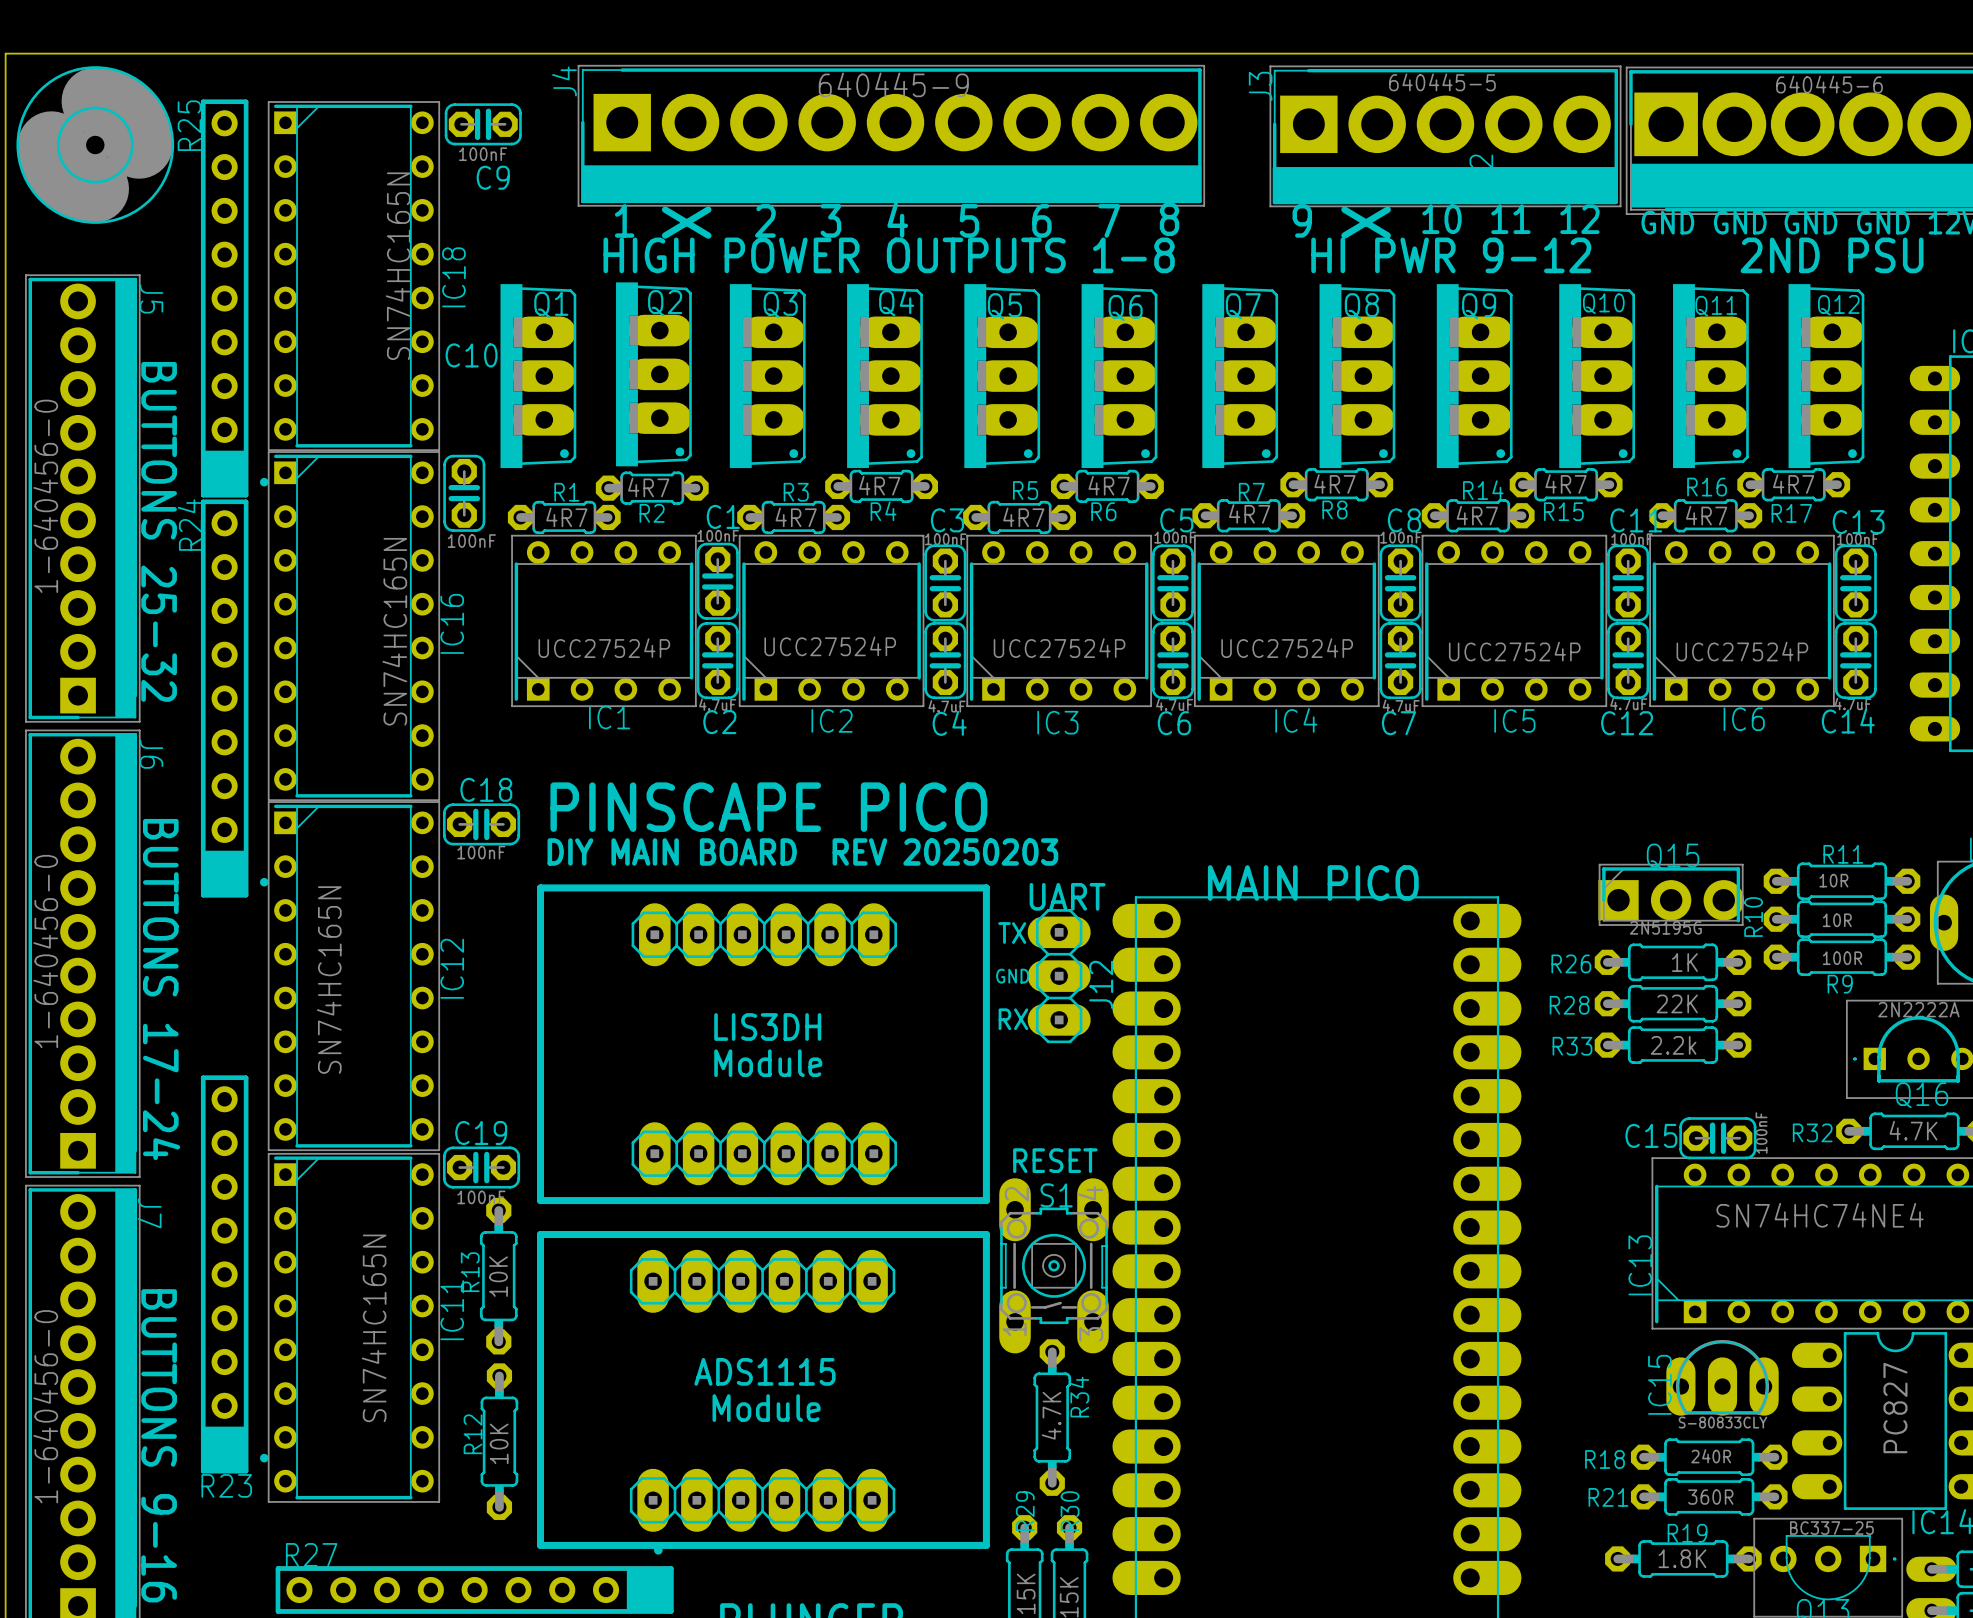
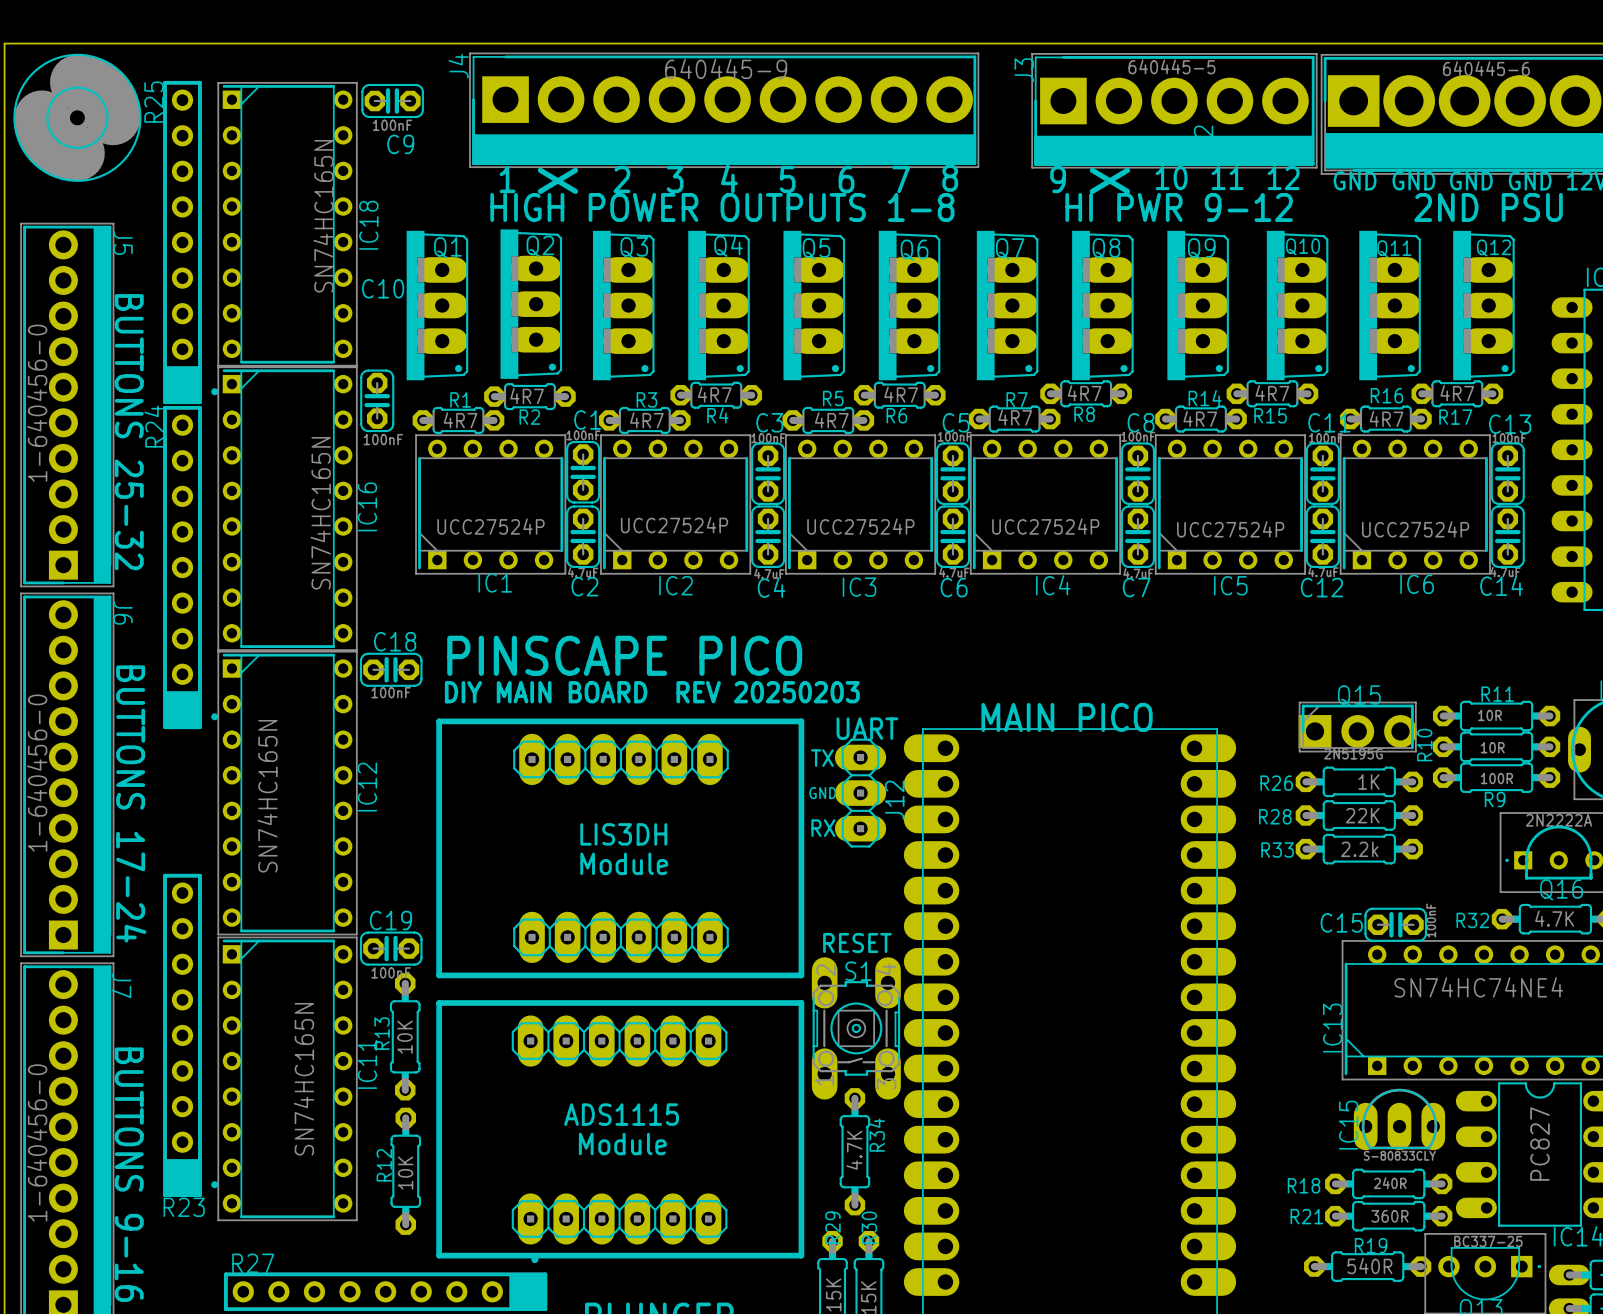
R19 value: 1.8K (1682, 1558) -> 540R (1369, 1266)

